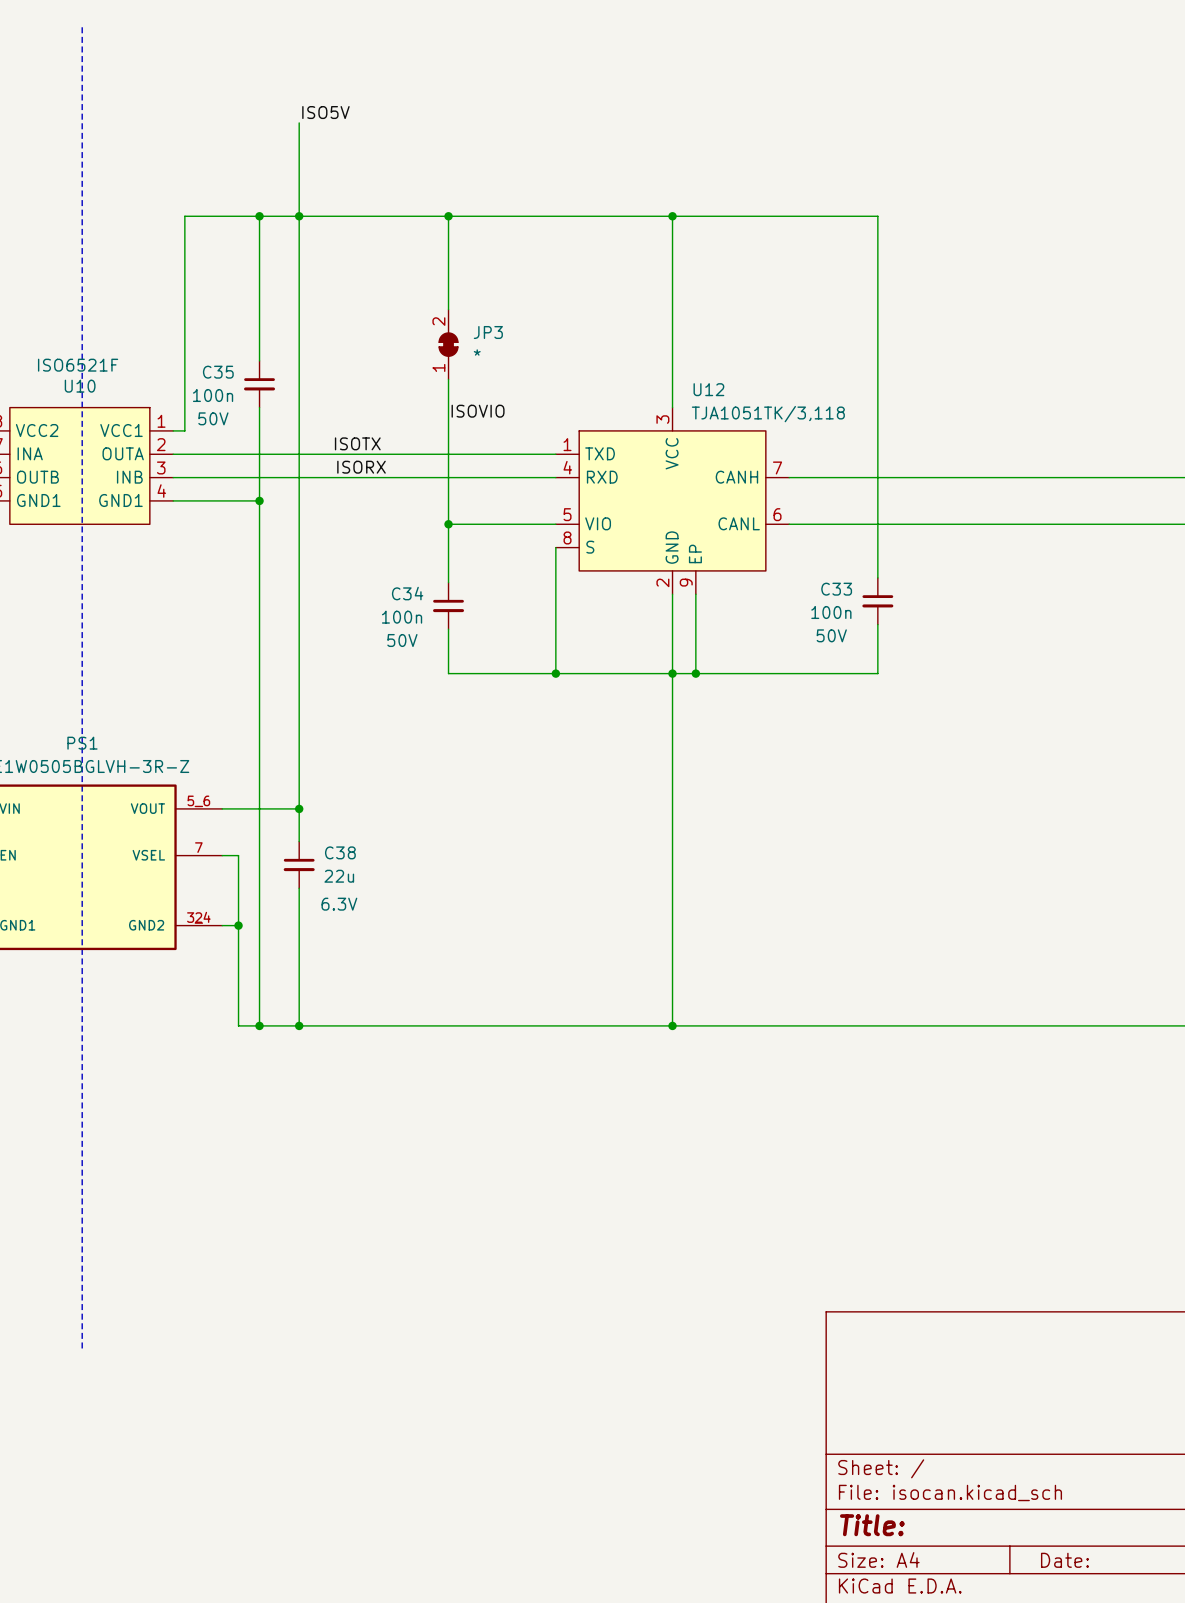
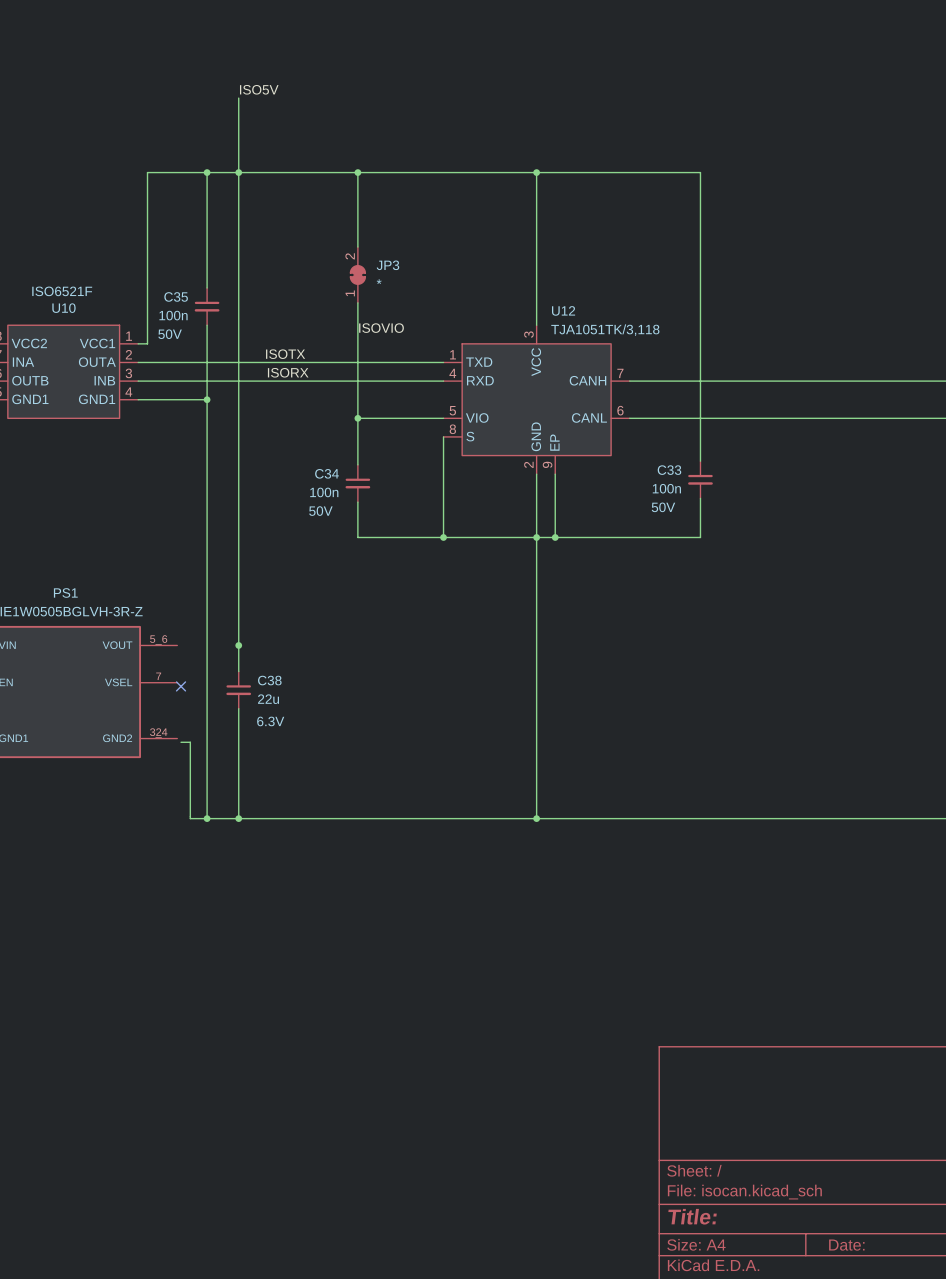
line: (82, 27) (82, 1350) -> none
wire: (222, 808) (299, 808) -> none
wire: (222, 855) (238, 855) (238, 930) -> (181, 742) (190, 742)
no-connect mark: none -> (181, 686)
wire: (222, 925) (238, 925) -> none
junction: (238, 925) -> none

